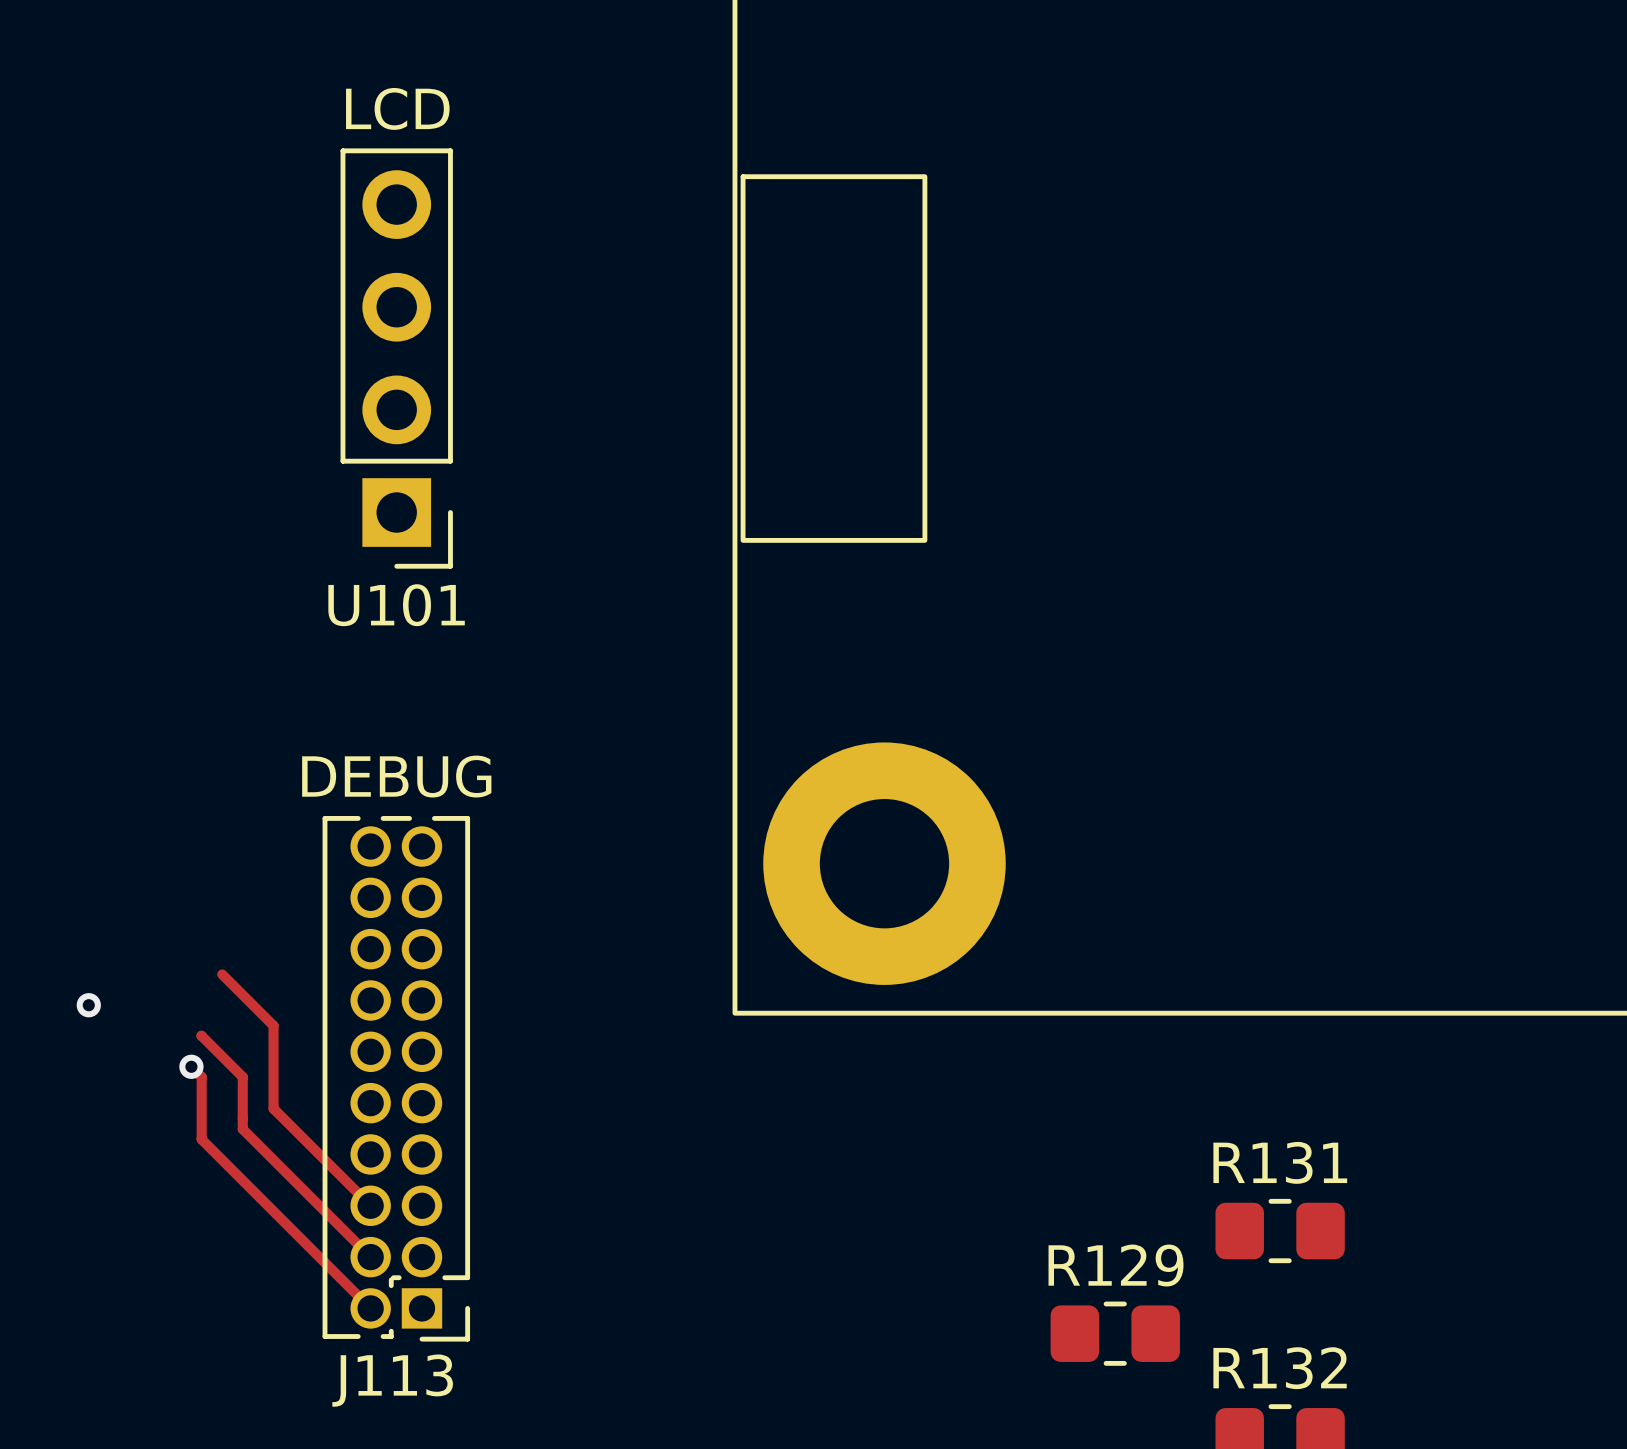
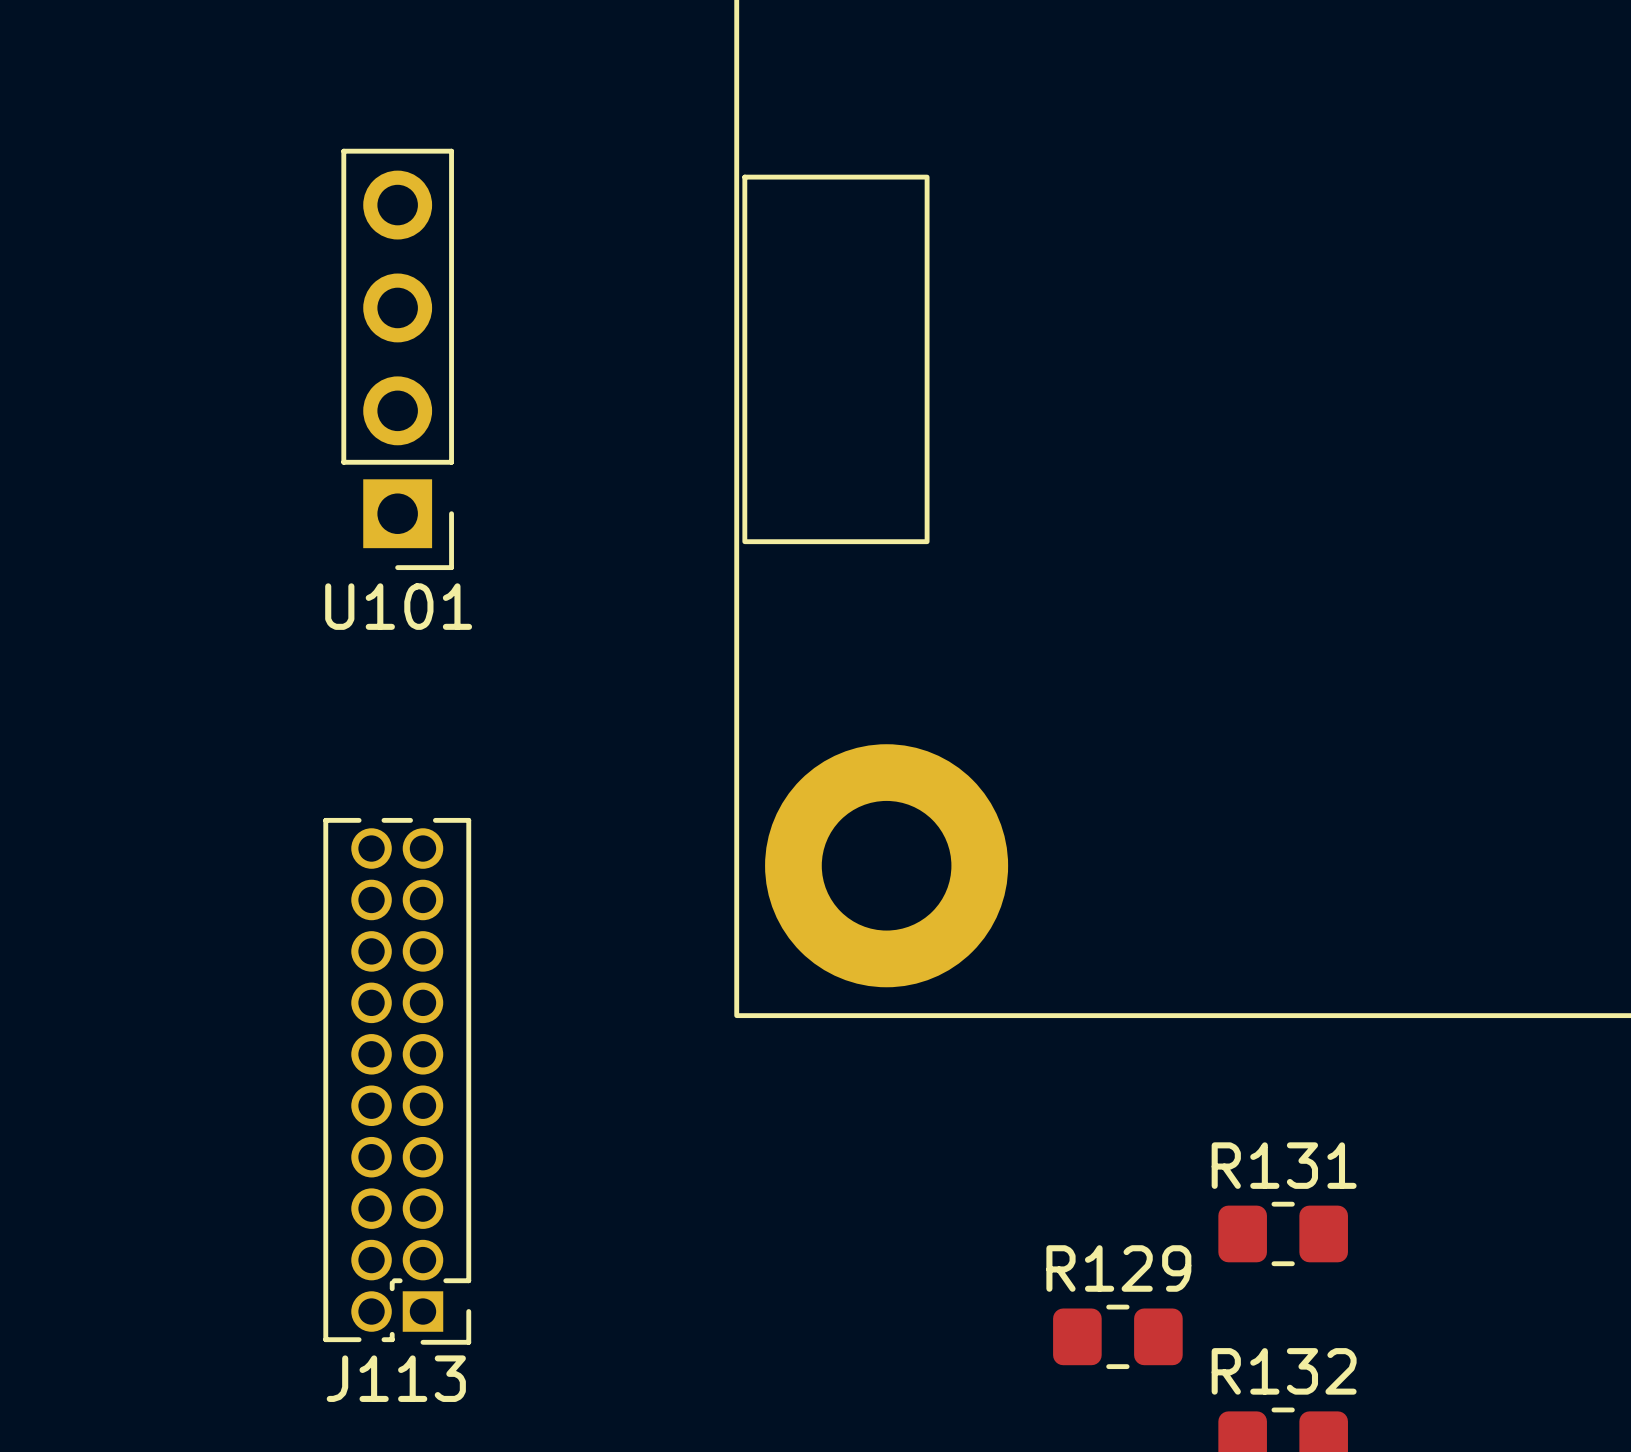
U101 value: LCD (397, 108) -> none
J113 value: DEBUG (396, 776) -> none
track: (222, 974) (273, 1025) (273, 1108) (370, 1205) -> none
via: (88, 1005) -> none
track: (201, 1035) (242, 1077) (242, 1129) (370, 1257) -> none
track: (191, 1066) (201, 1077) (201, 1139) (370, 1308) -> none
via: (191, 1066) -> none

